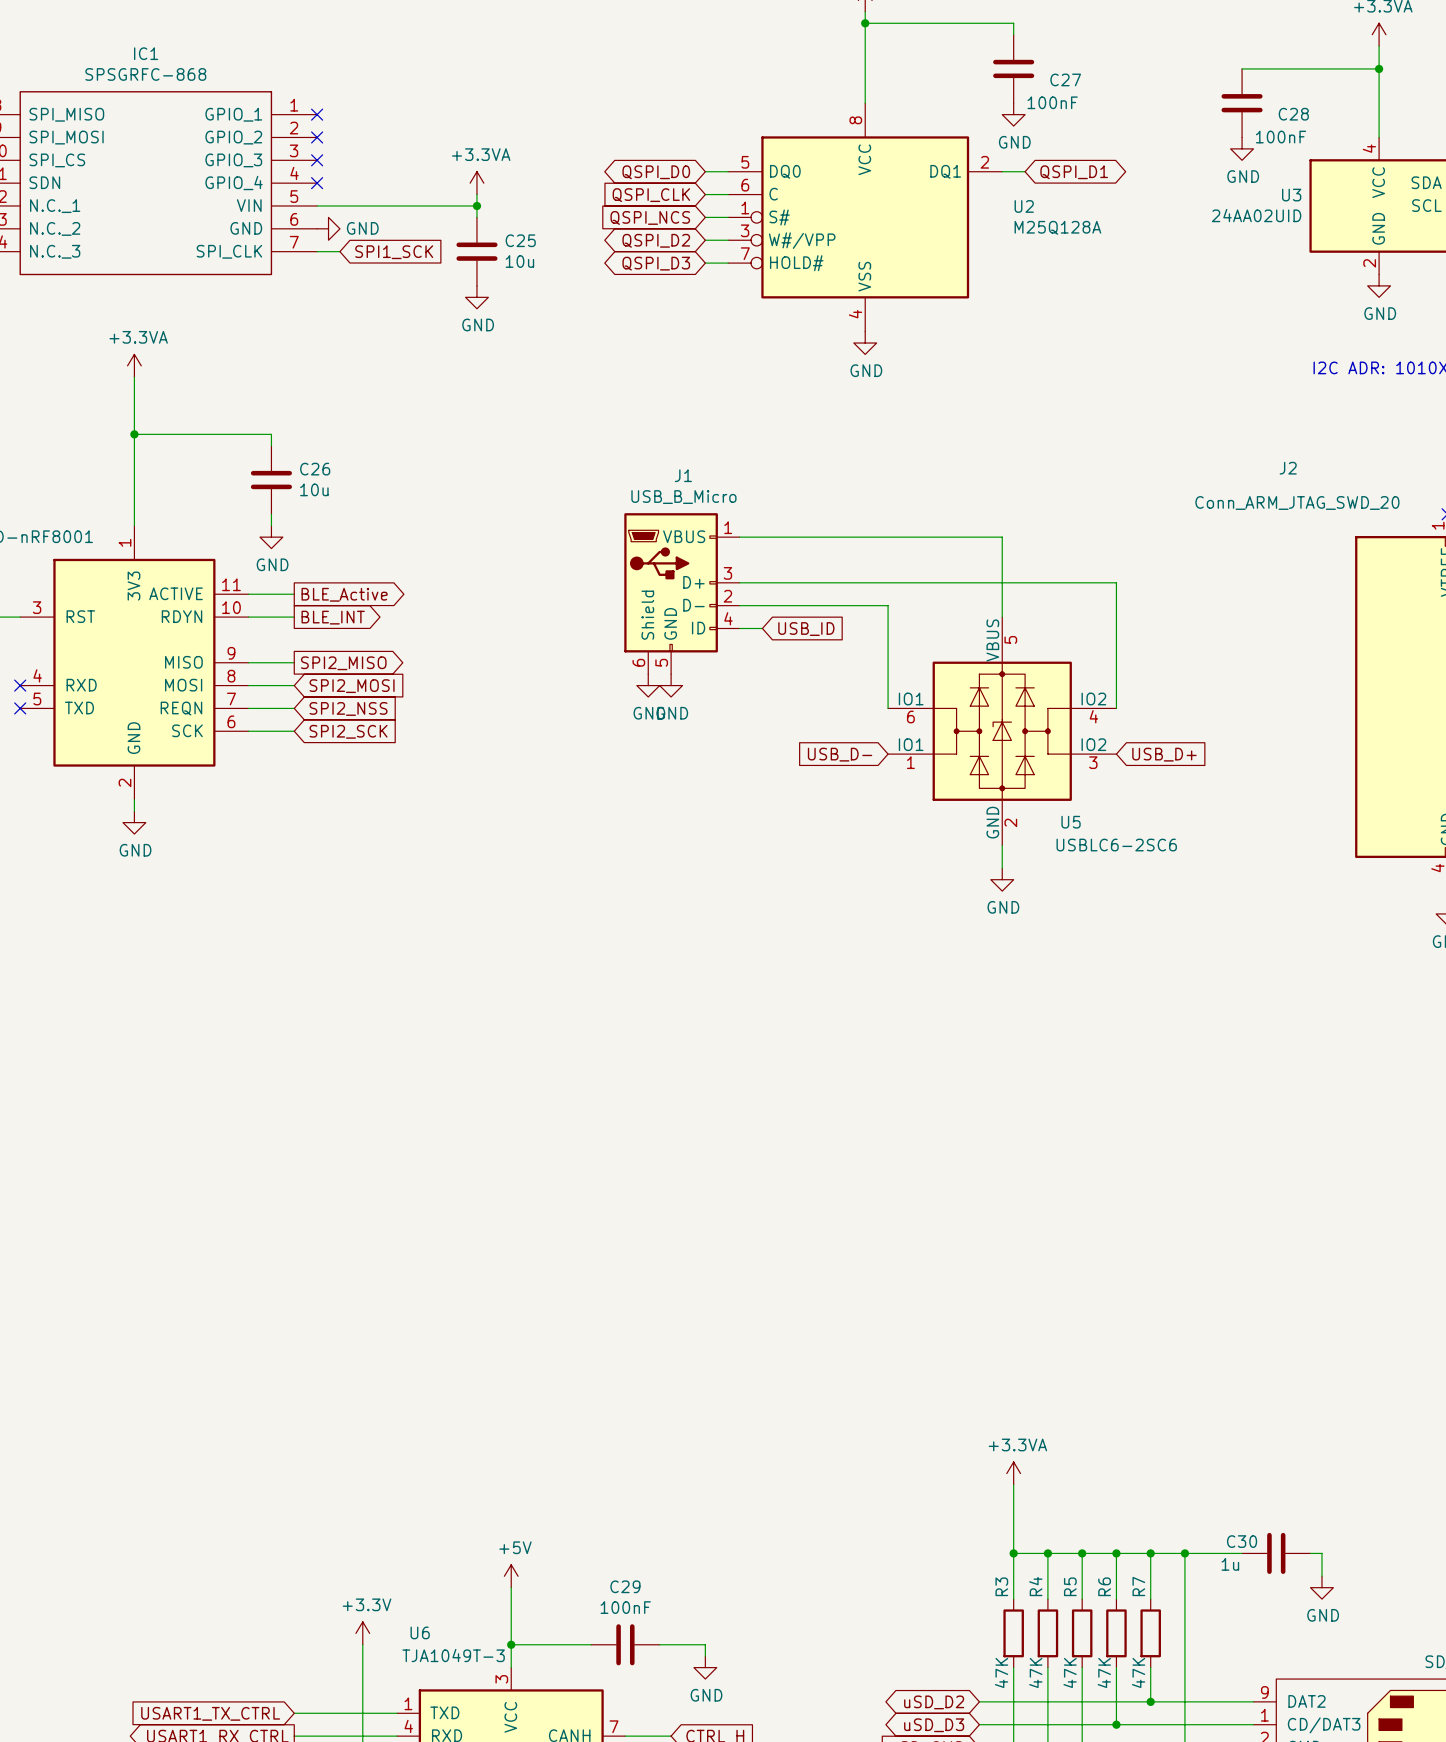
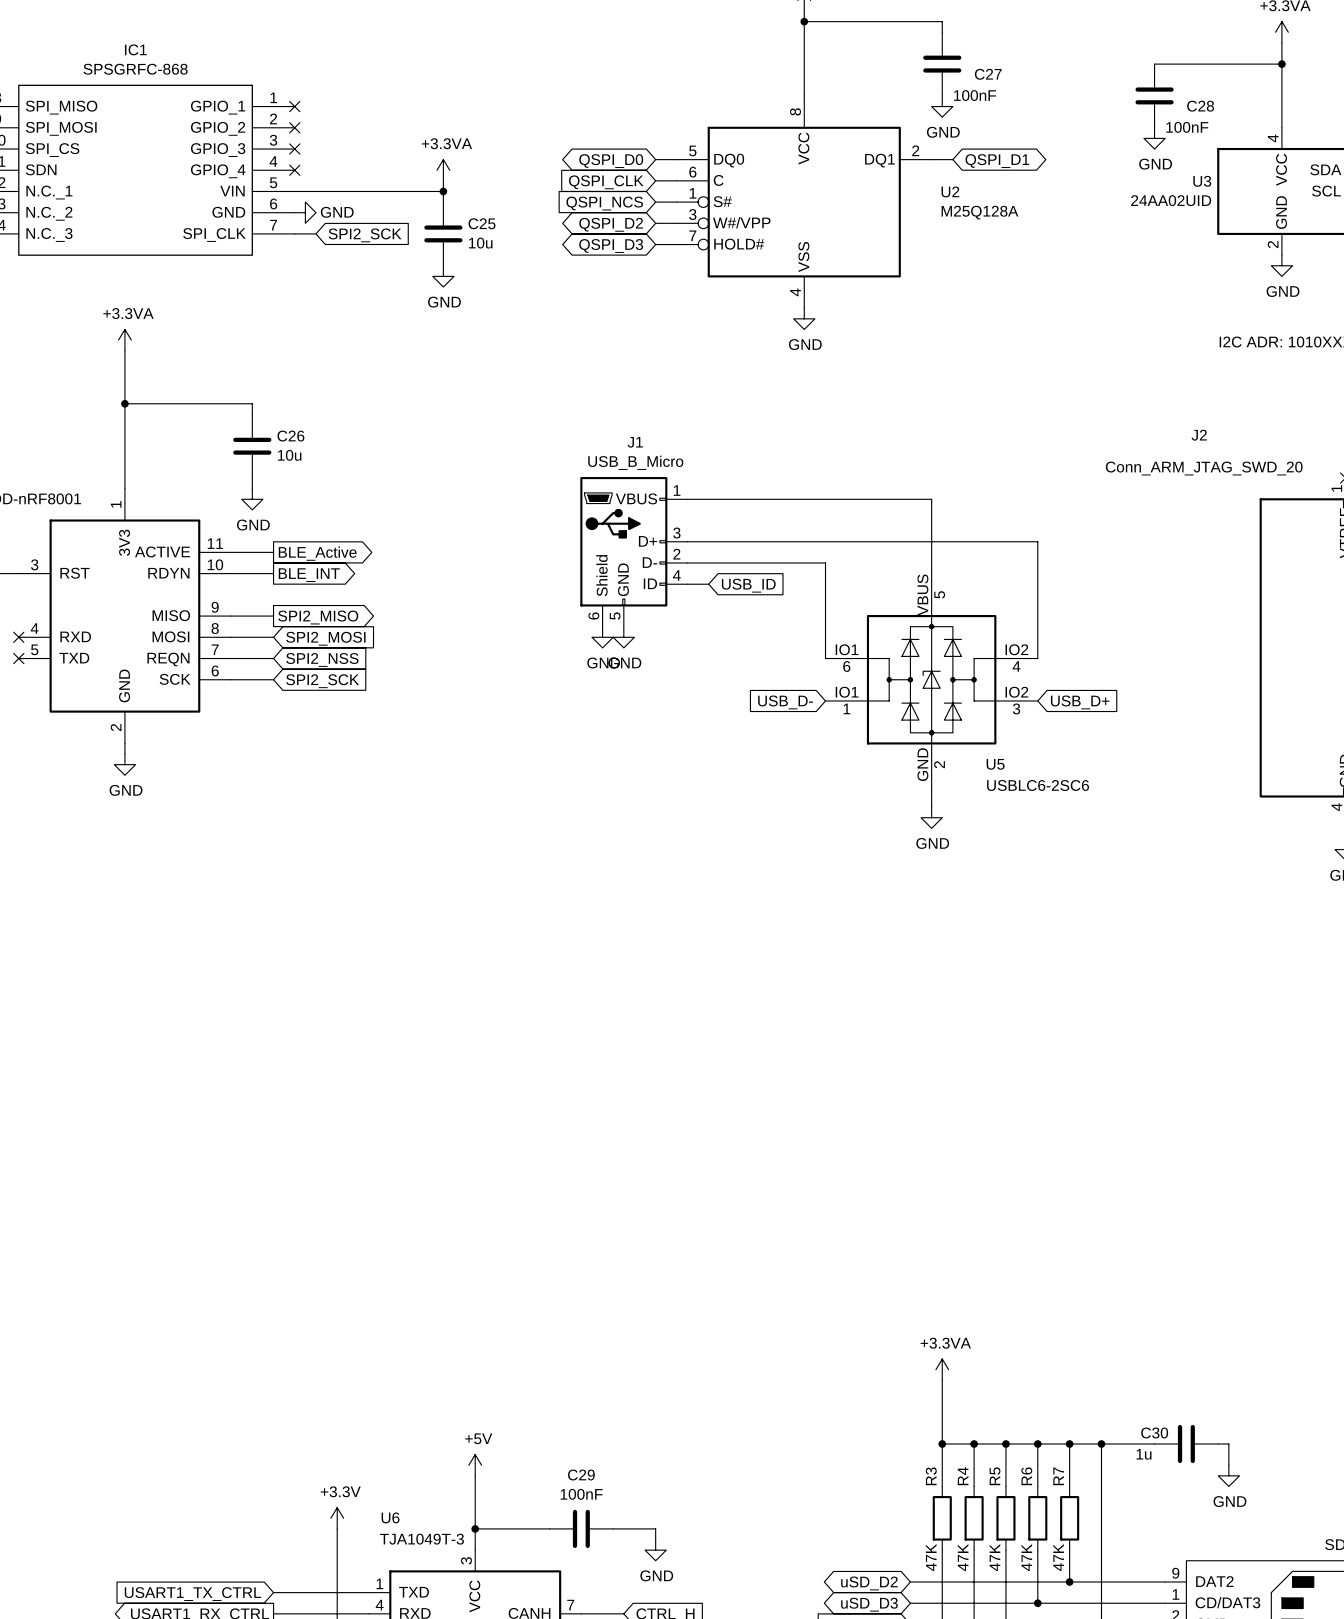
global label: SPI1_SCK (394, 252) -> SPI2_SCK (365, 235)

